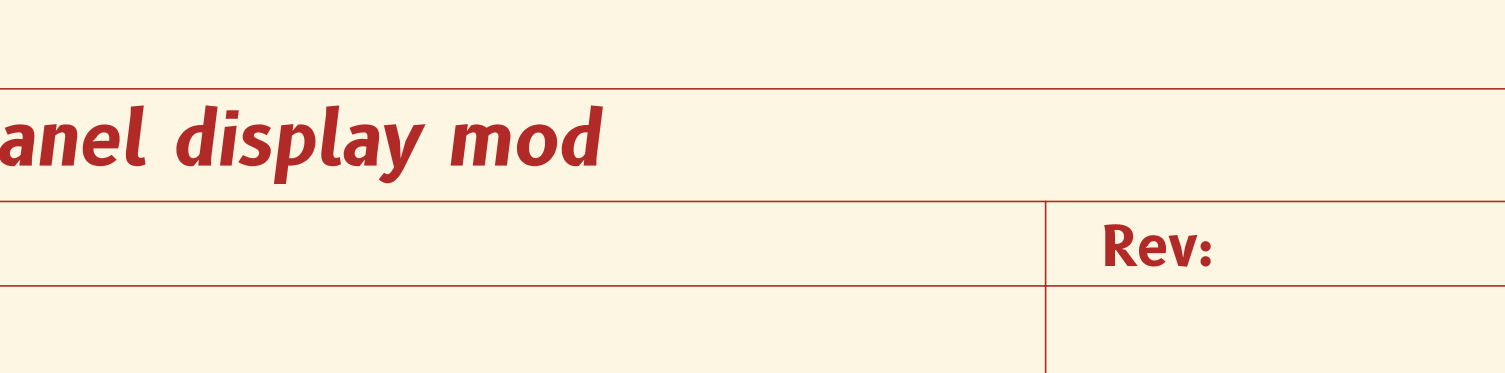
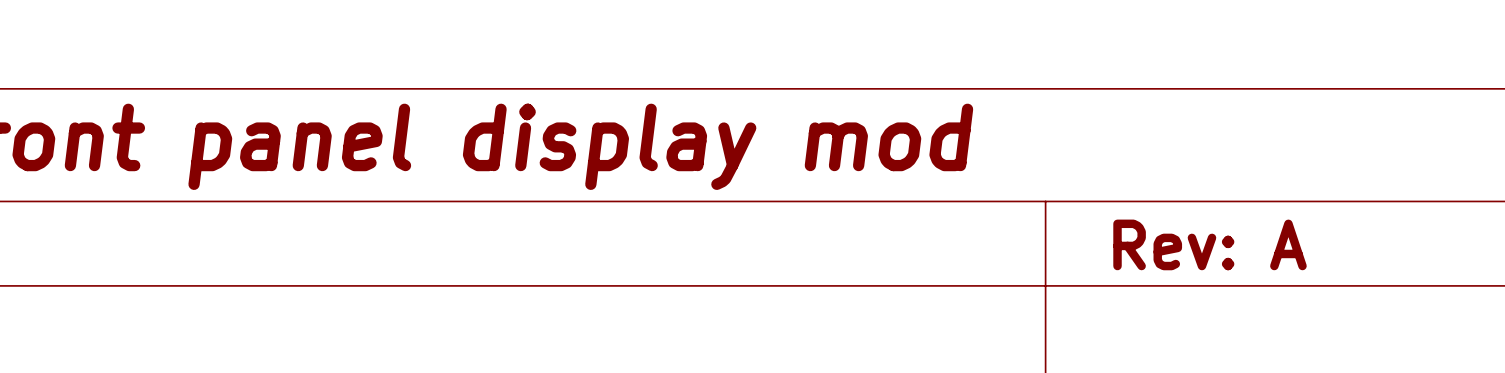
title block: Rev: (1157, 245) -> Rev: A (1210, 244)

